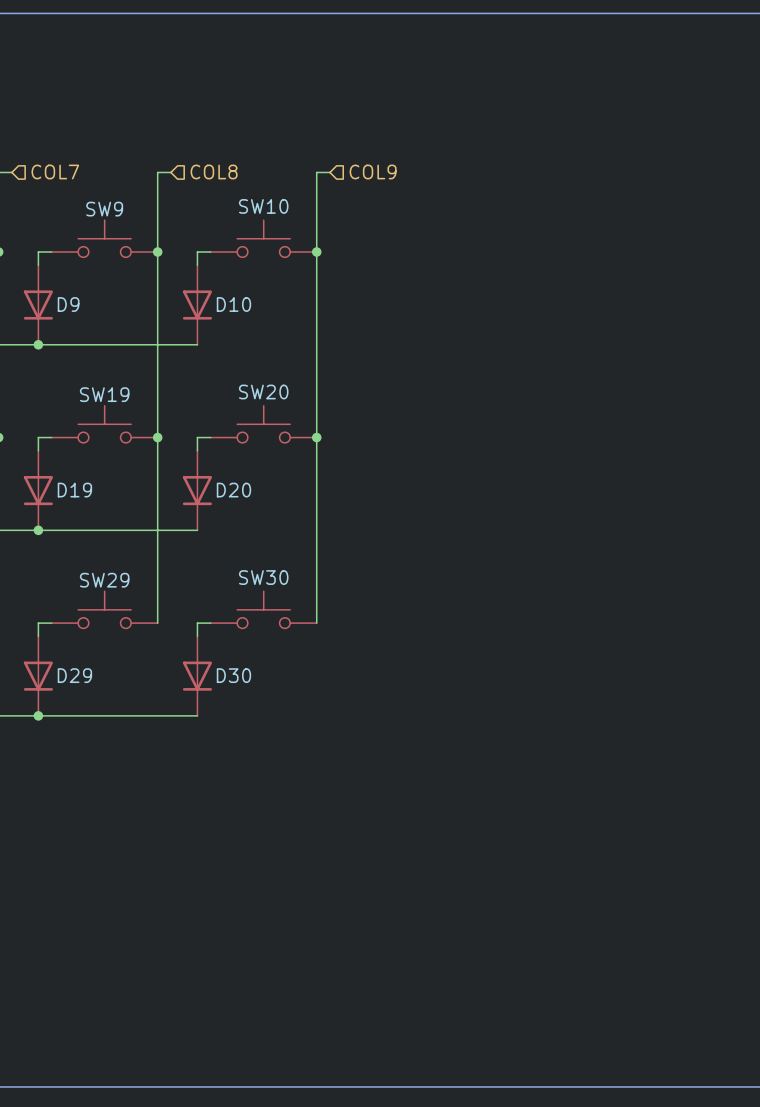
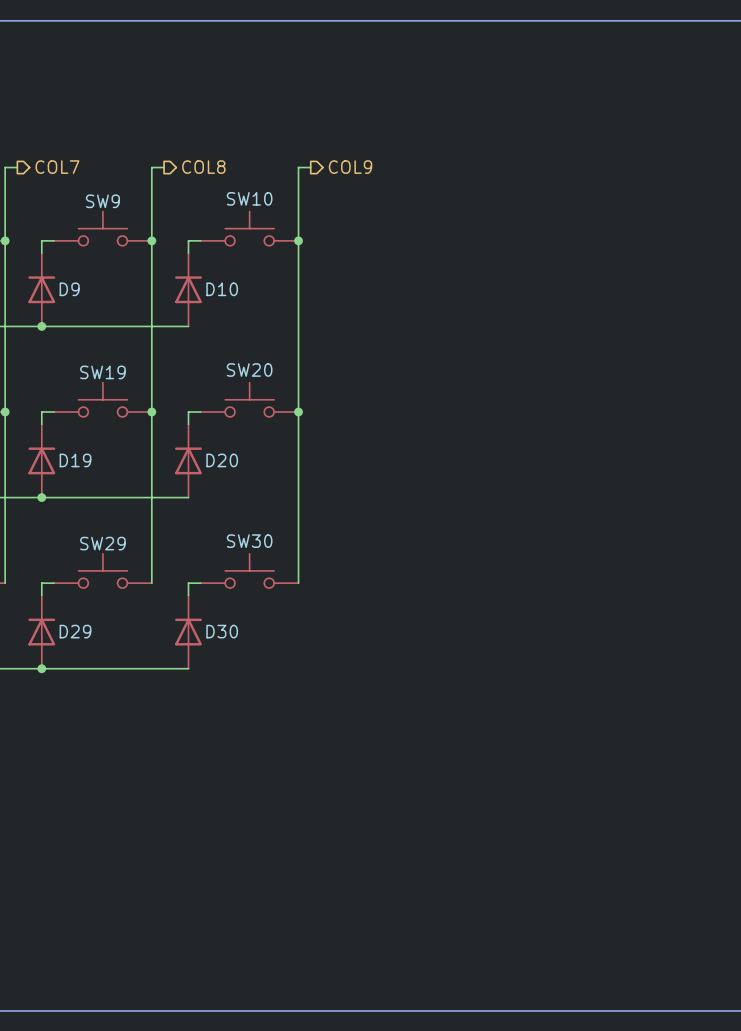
hierarchical label shape: input (55, 171) -> output (57, 167)
hierarchical label shape: input (214, 171) -> output (203, 167)
hierarchical label shape: input (373, 171) -> output (350, 167)
D9 rotation: 0° (38, 305) -> 180° (41, 289)
D10 rotation: 0° (197, 305) -> 180° (188, 289)
D19 rotation: 0° (38, 490) -> 180° (41, 460)
D20 rotation: 0° (197, 490) -> 180° (188, 460)
D29 rotation: 0° (38, 676) -> 180° (41, 632)
D30 rotation: 0° (197, 676) -> 180° (188, 632)

